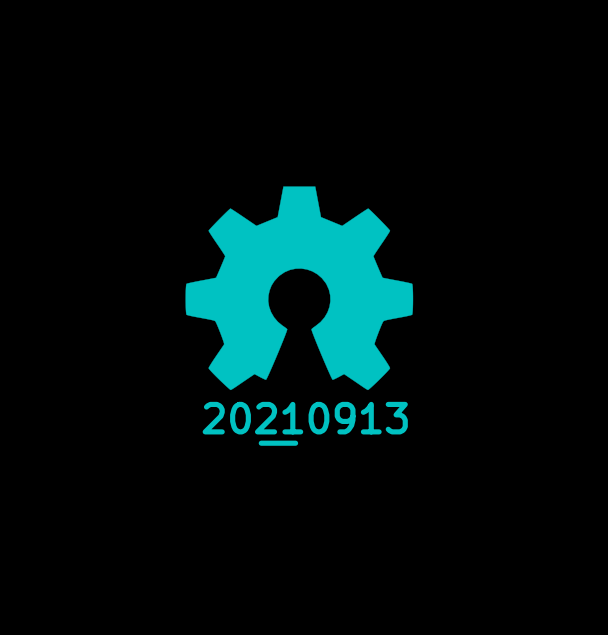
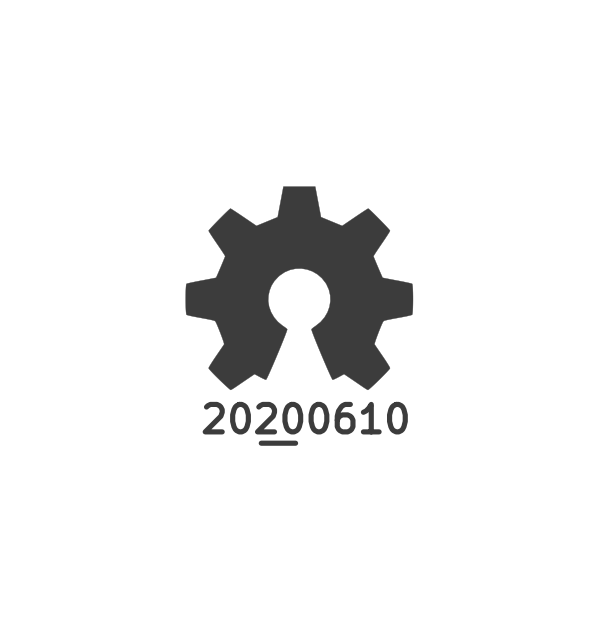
drawing shape: [202, 401, 408, 446] -> [202, 401, 408, 446]

